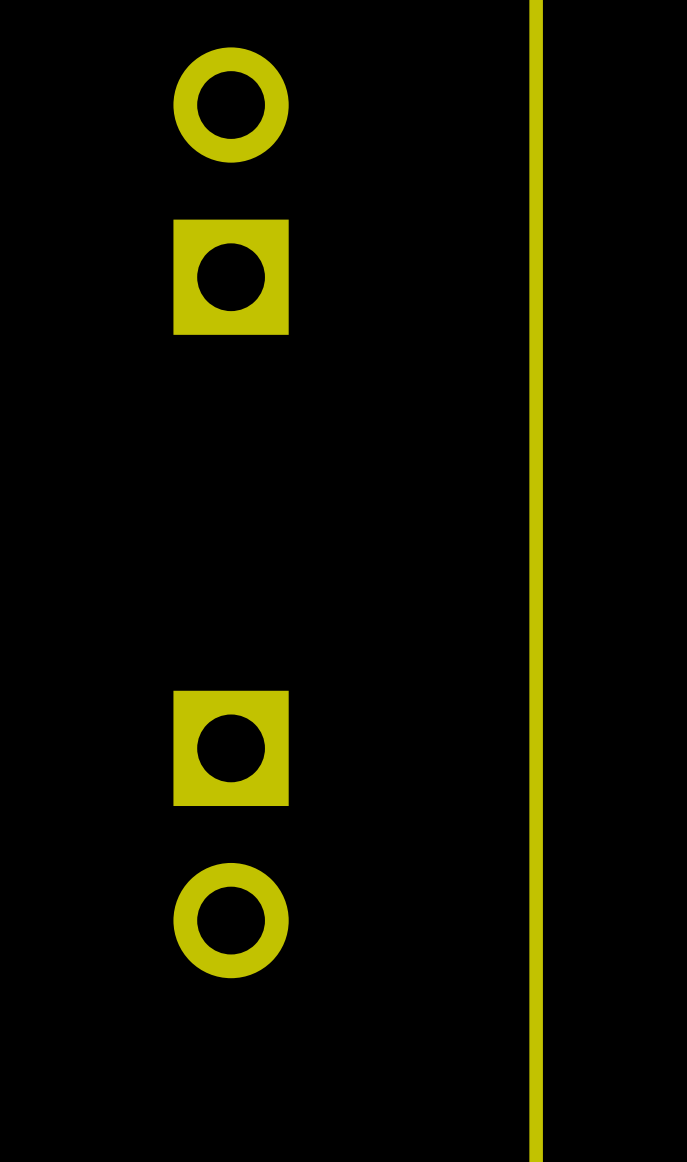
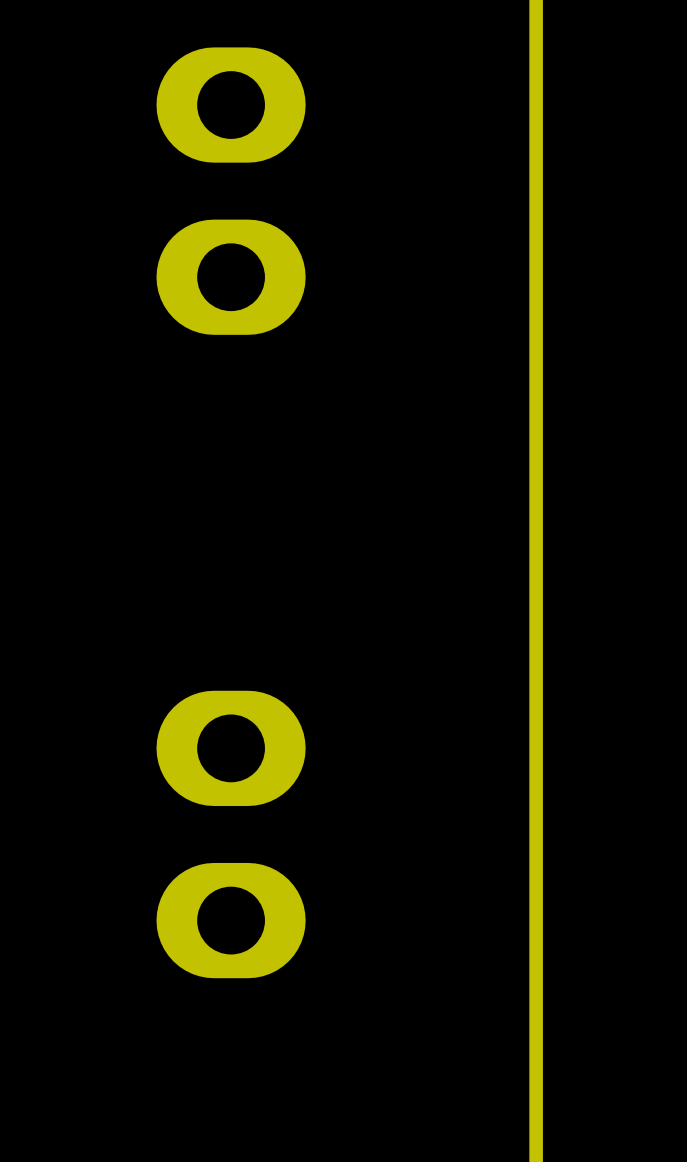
part footprint: [173, 47, 289, 335] -> [156, 47, 306, 335]
part footprint: [173, 690, 289, 979] -> [156, 690, 306, 979]

